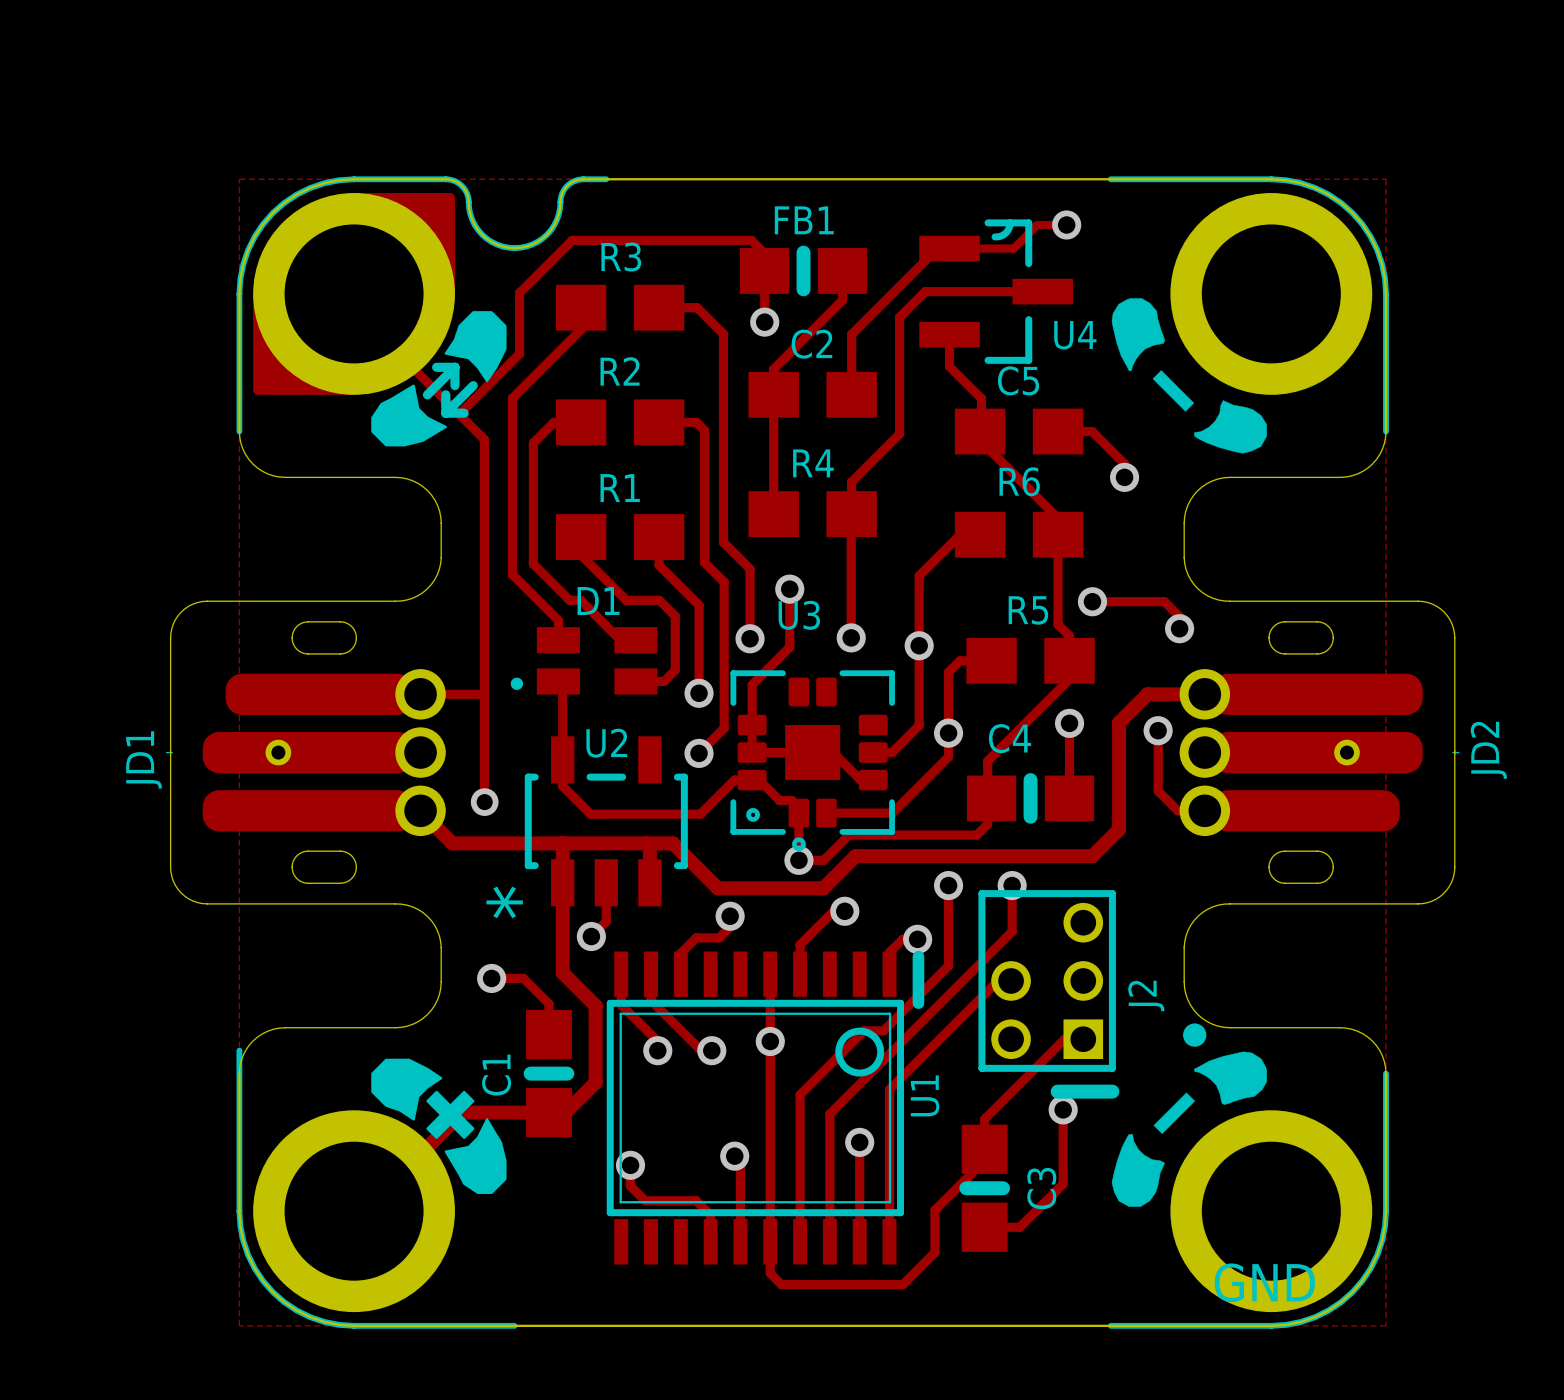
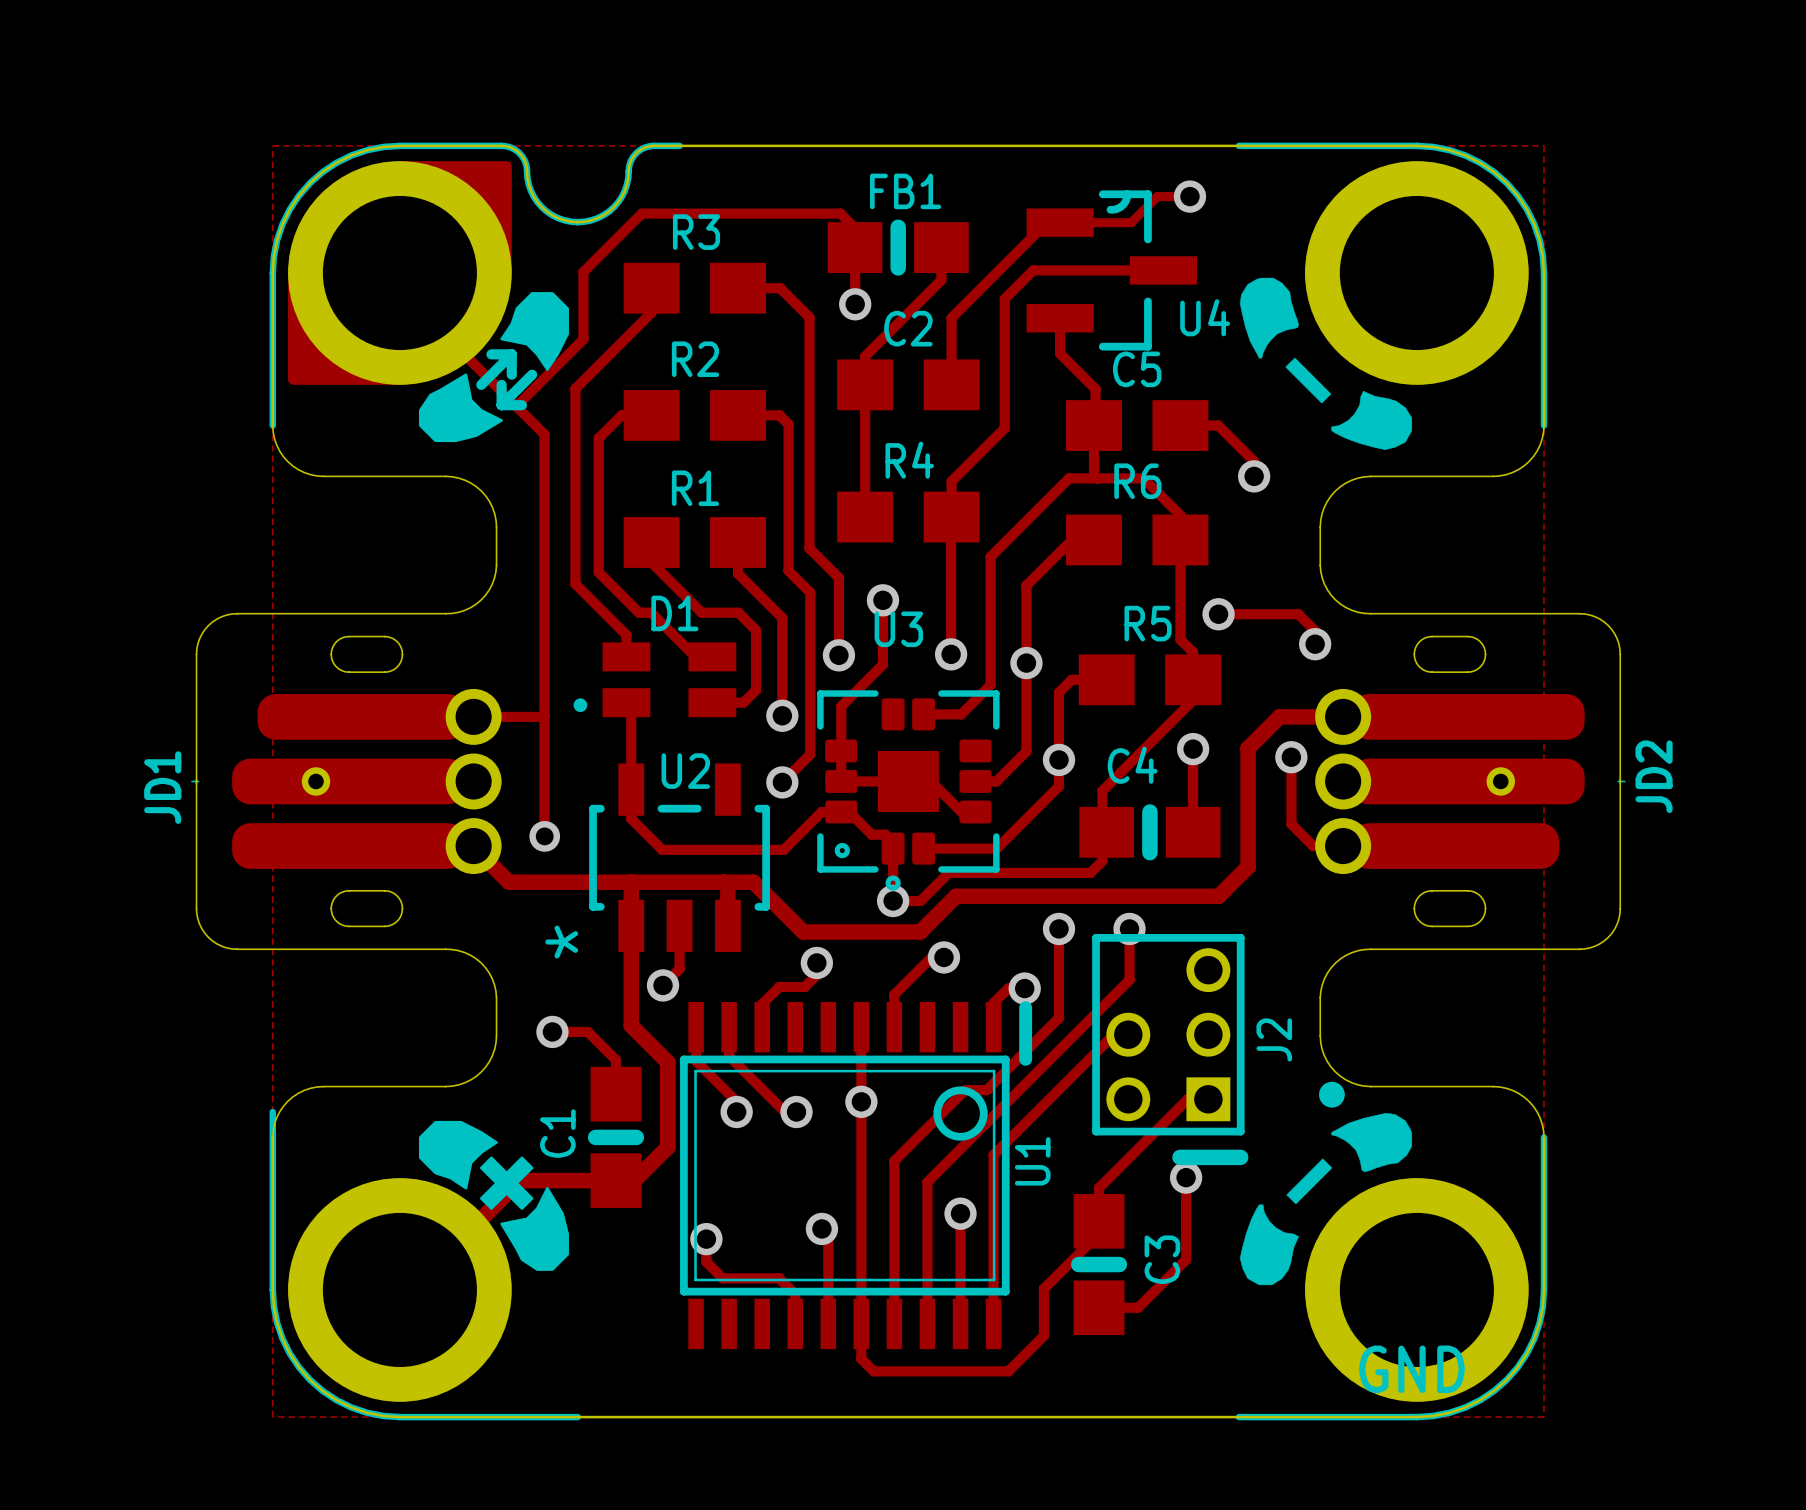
track: (980, 440) (1058, 518) -> (1093, 435) (1093, 474) (1097, 478)
track: none -> (1180, 521) (1180, 515) (1143, 478) (1069, 478) (990, 556) (990, 685) (961, 714) (923, 714)

